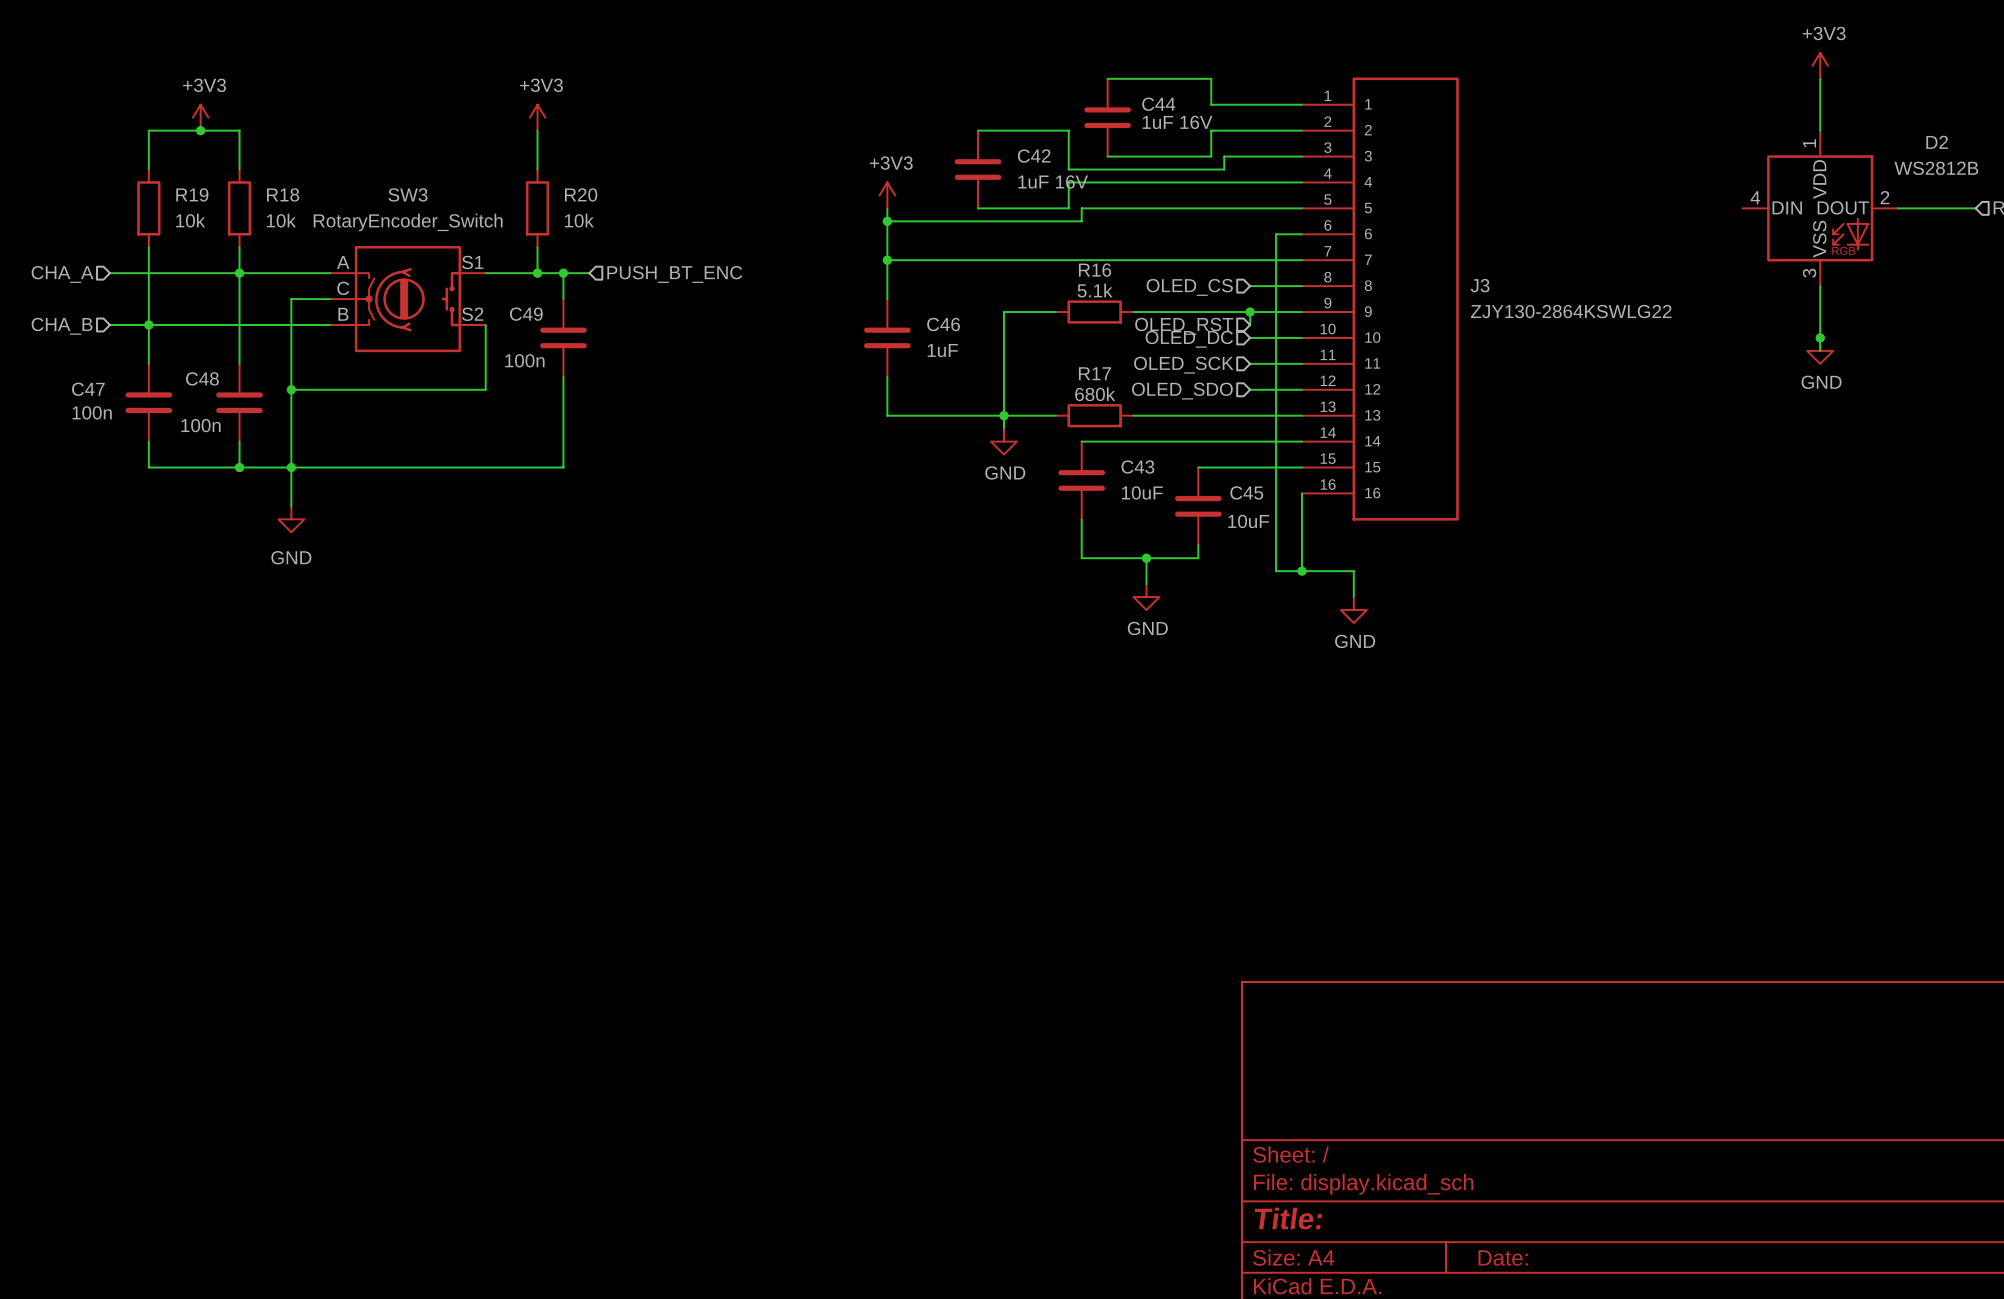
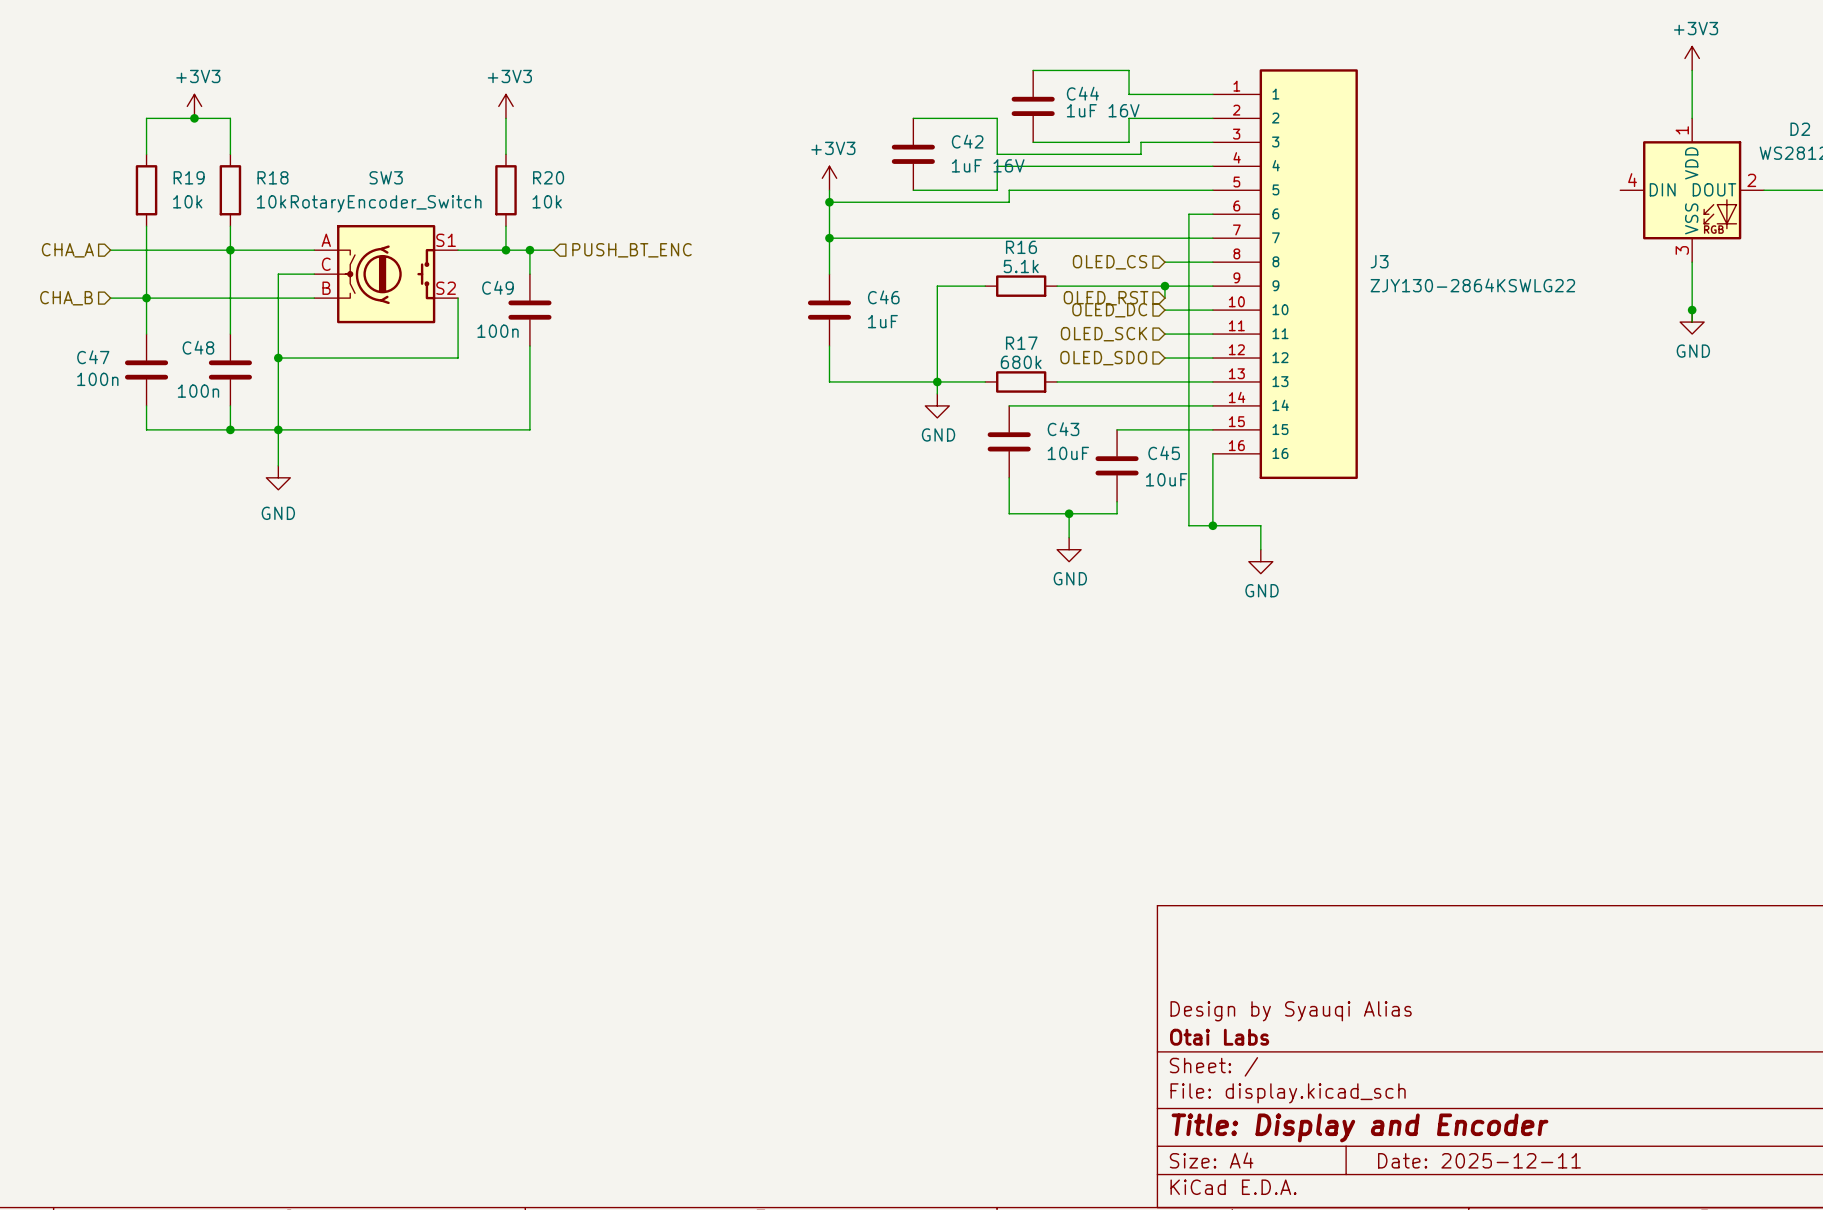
title block: none -> Design by Syauqi Alias (1291, 1011)
title block: none -> Otai Labs (1219, 1037)
title block: Title: (1288, 1218) -> Title: Display and Encoder (1359, 1127)
title block: Date: (1503, 1258) -> Date: 2025-12-11 (1479, 1160)

